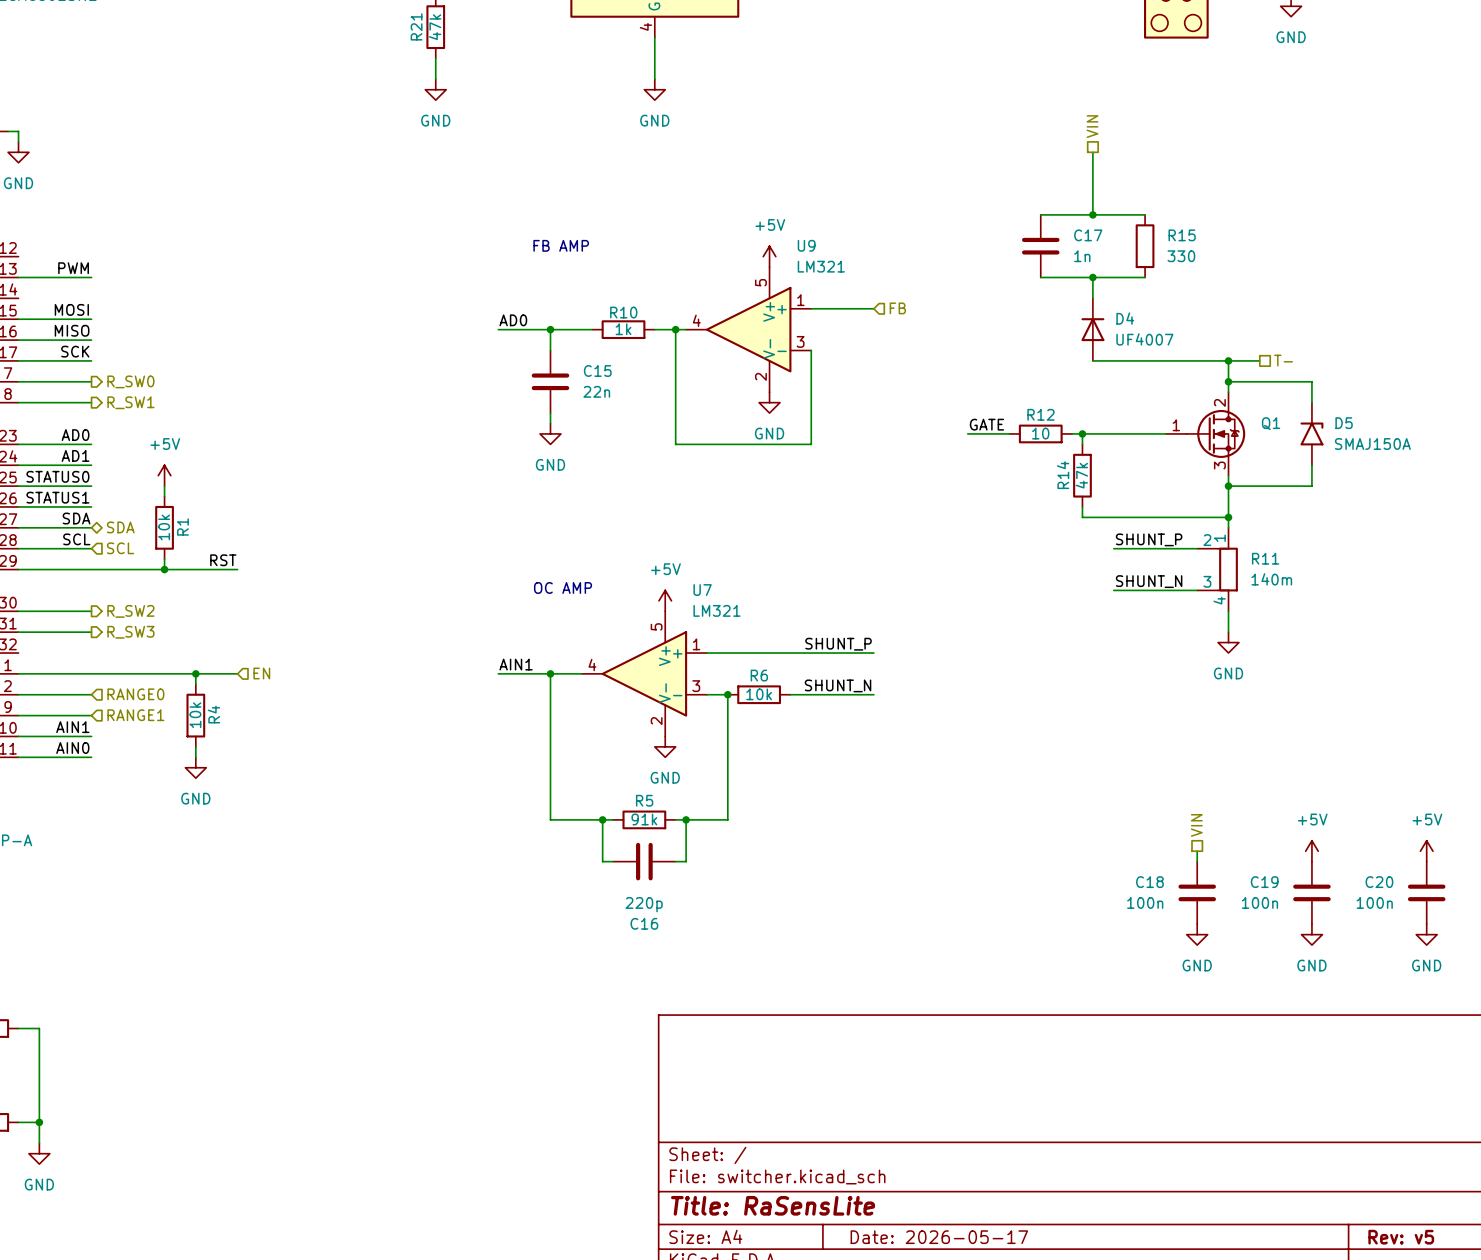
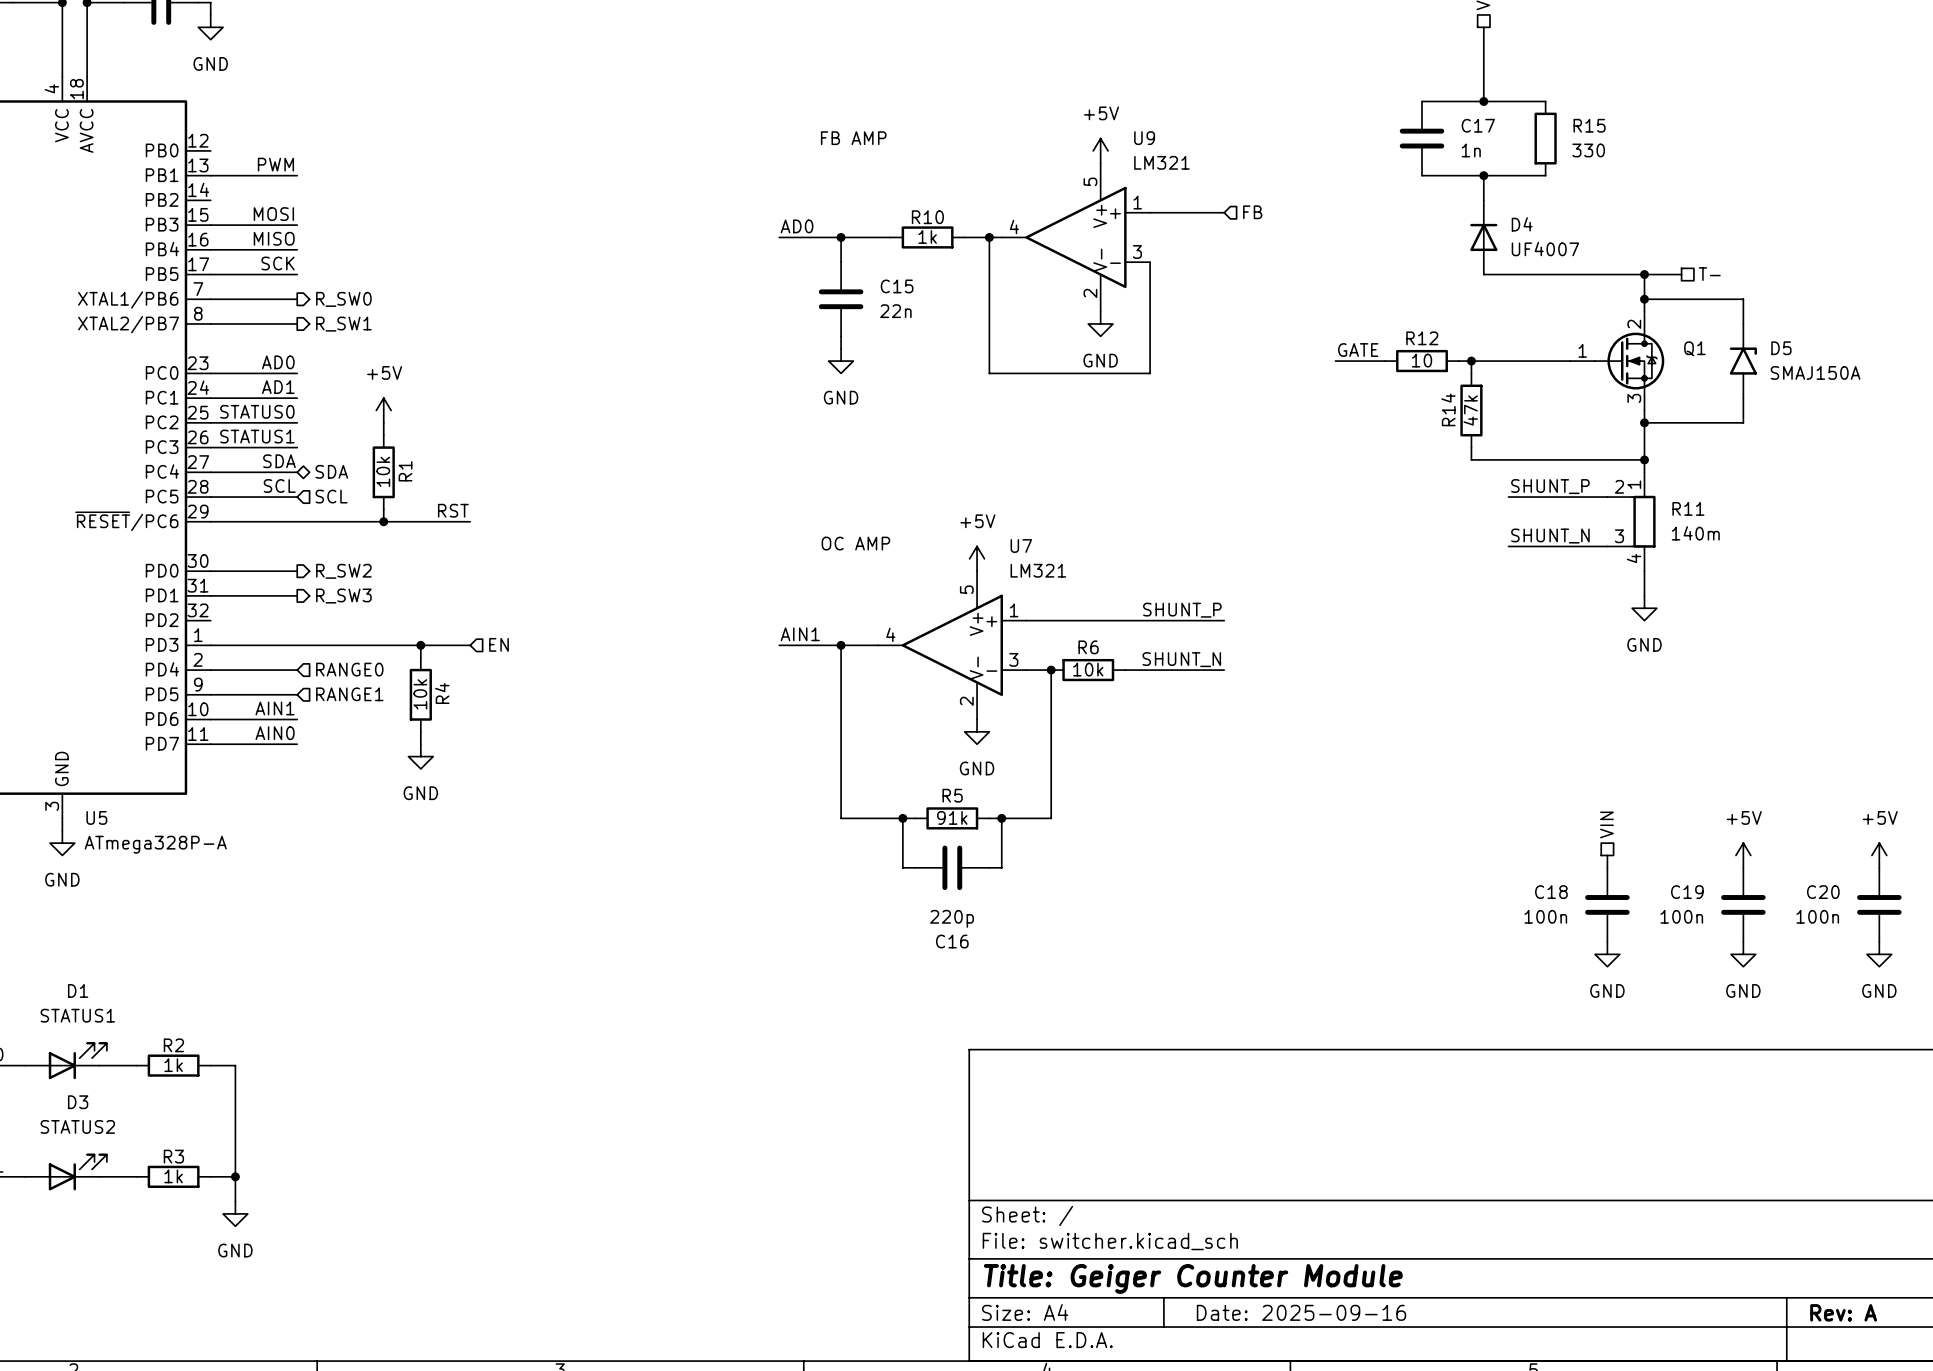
title block: Title: RaSensLite (773, 1205) -> Title: Geiger Counter Module (1193, 1278)
title block: Date: 2026-05-17 (939, 1237) -> Date: 2025-09-16 (1301, 1312)
title block: Rev: v5 (1401, 1237) -> Rev: A (1843, 1312)

